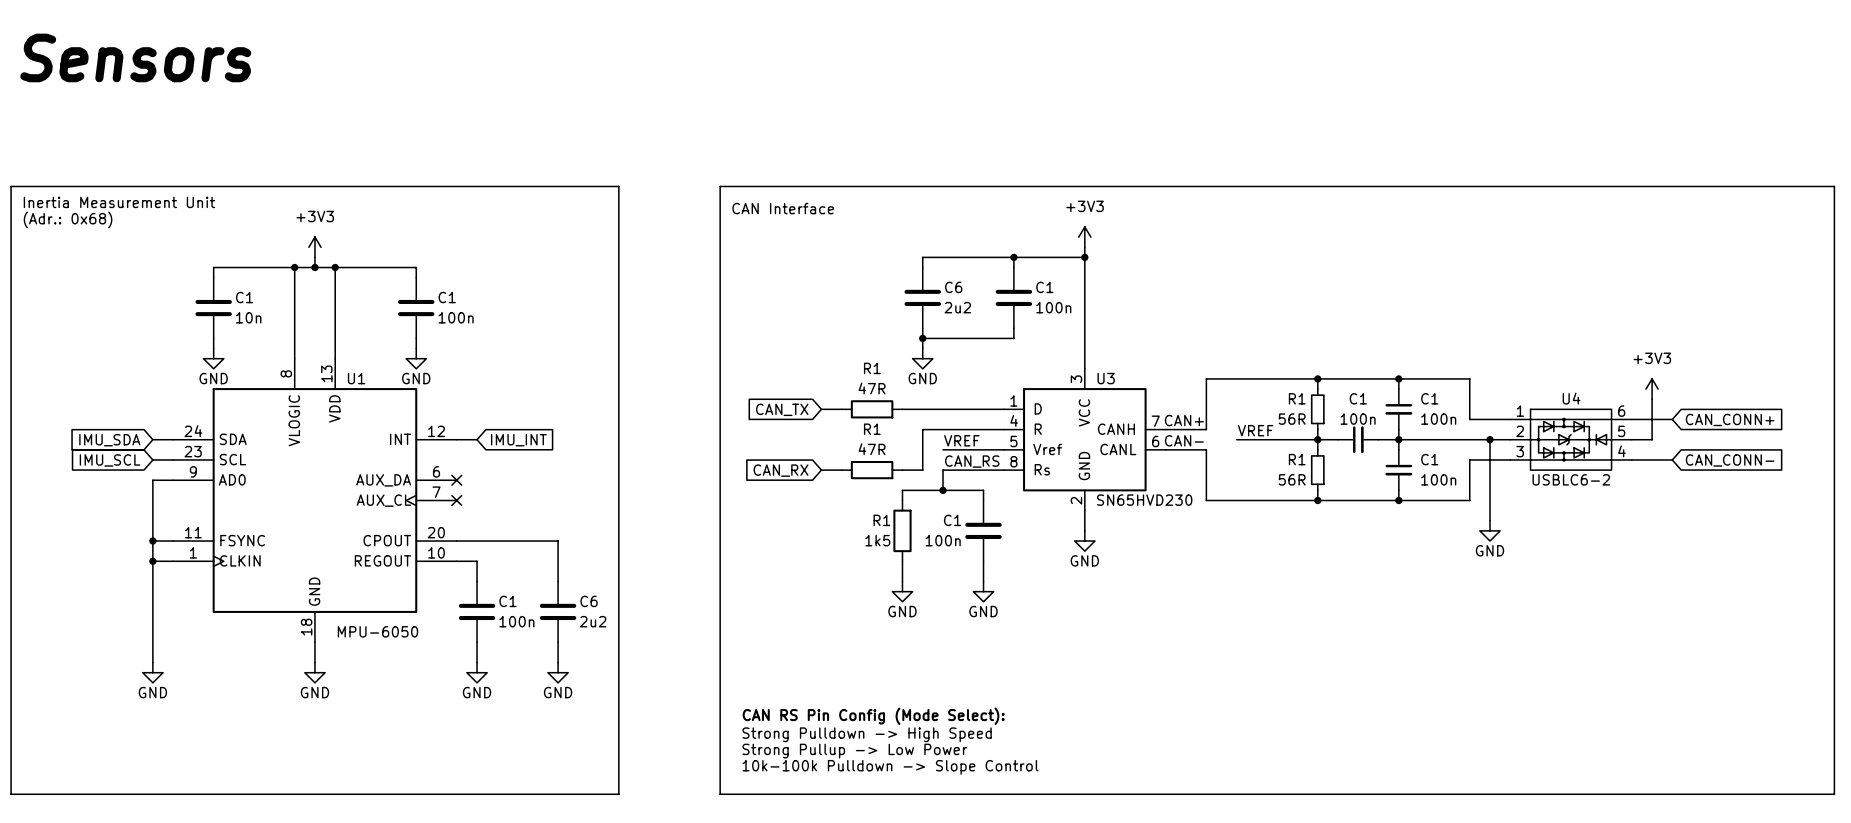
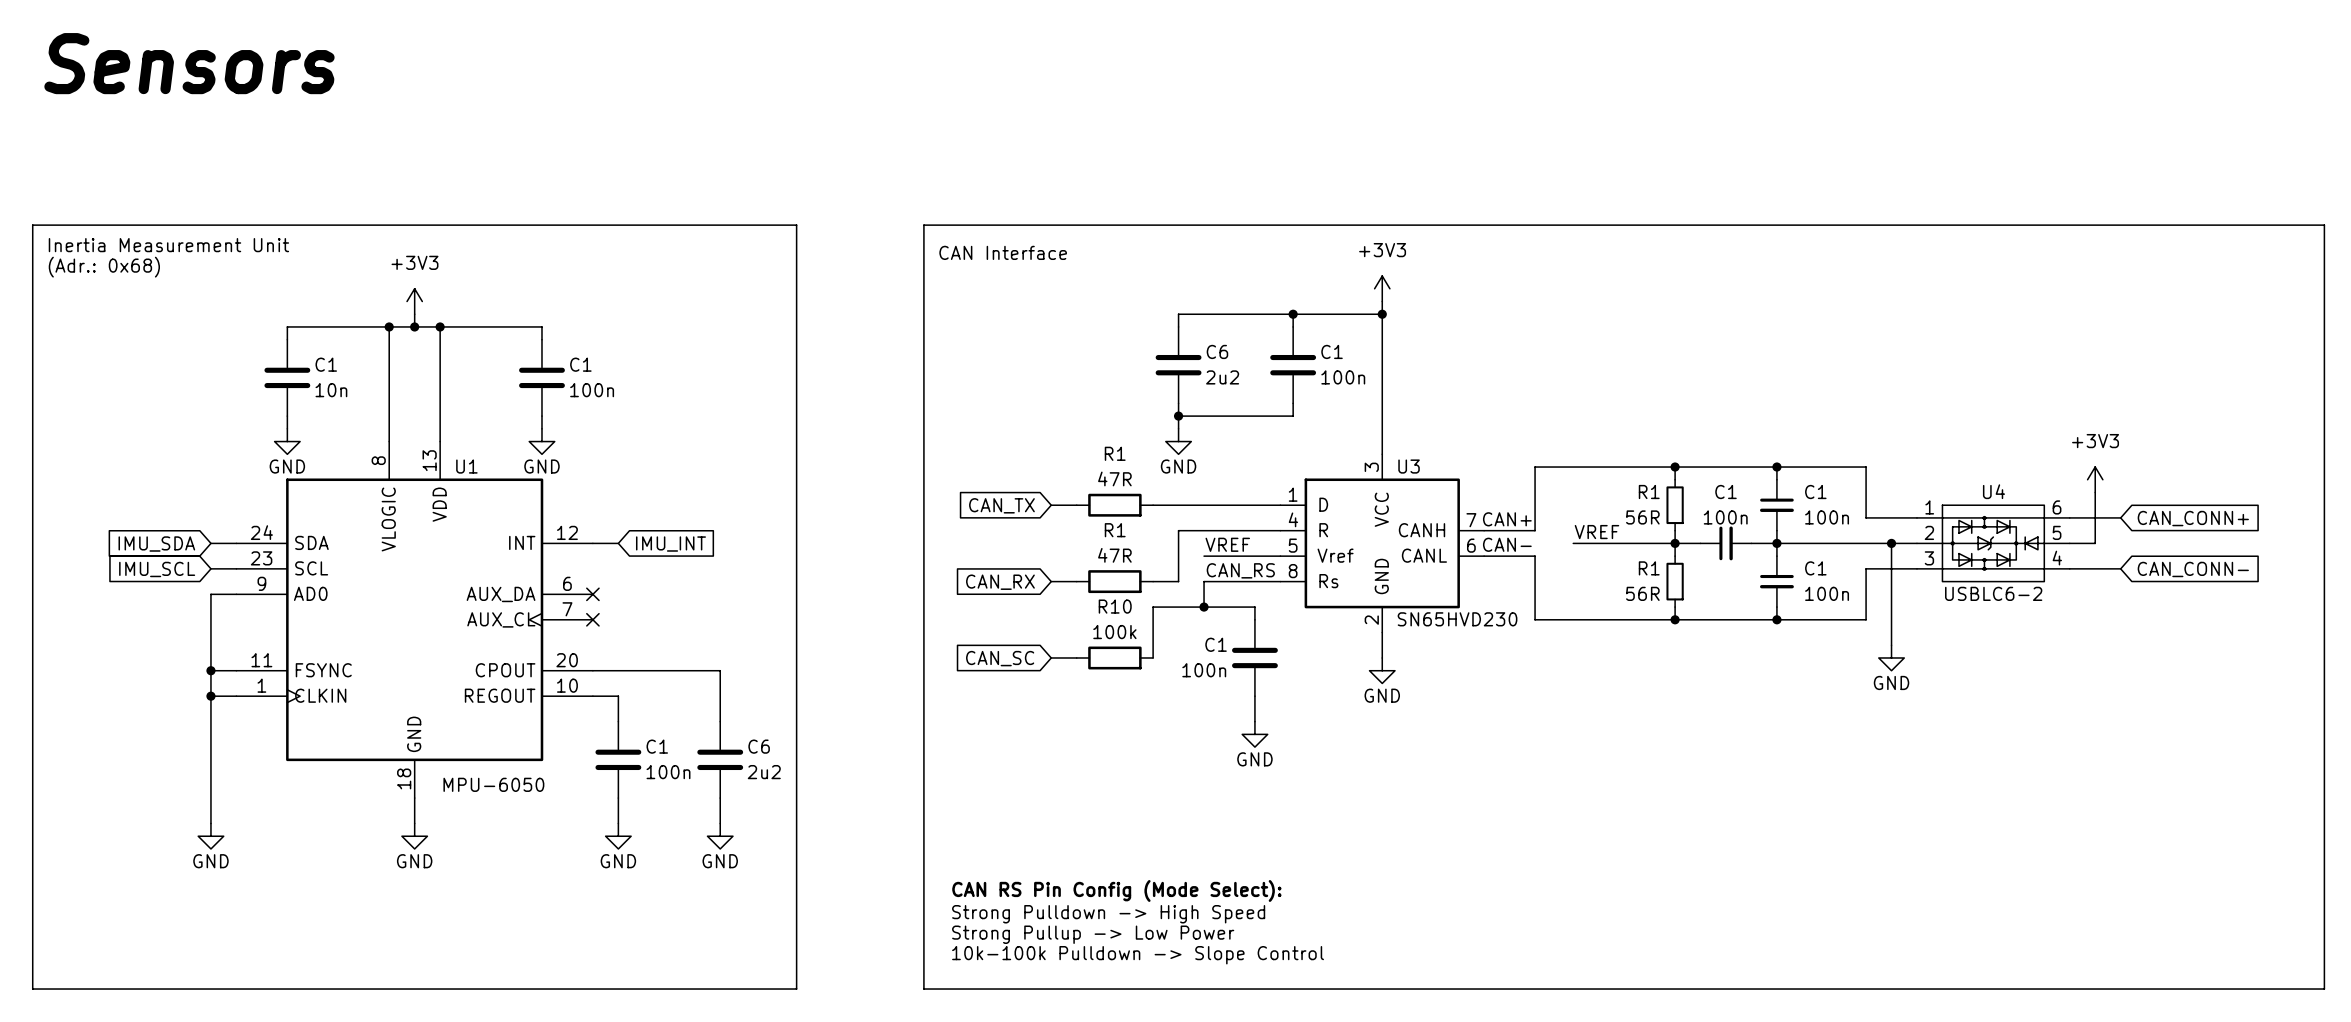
wire: none -> (1153, 619) (1153, 657)
wire: none -> (1051, 657) (1076, 657)
R10: none -> 100k (1114, 657)
R1: 1k5 (902, 530) -> none
global label: none -> CAN_SC (1000, 658)
wire: (902, 561) (902, 581) -> none
power symbol: GND (902, 591) -> none

